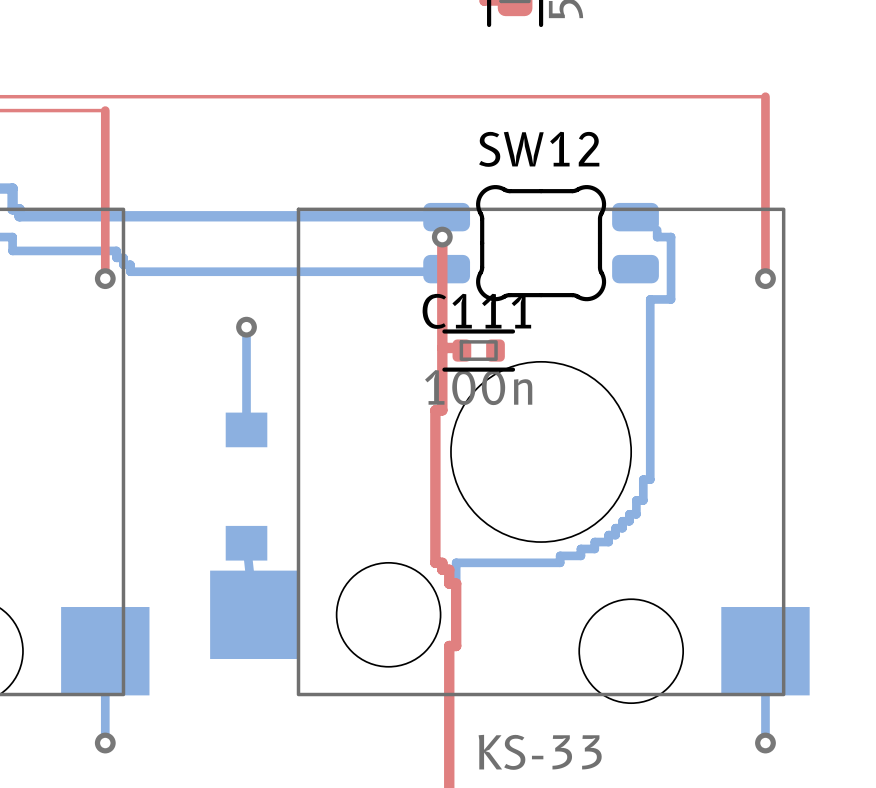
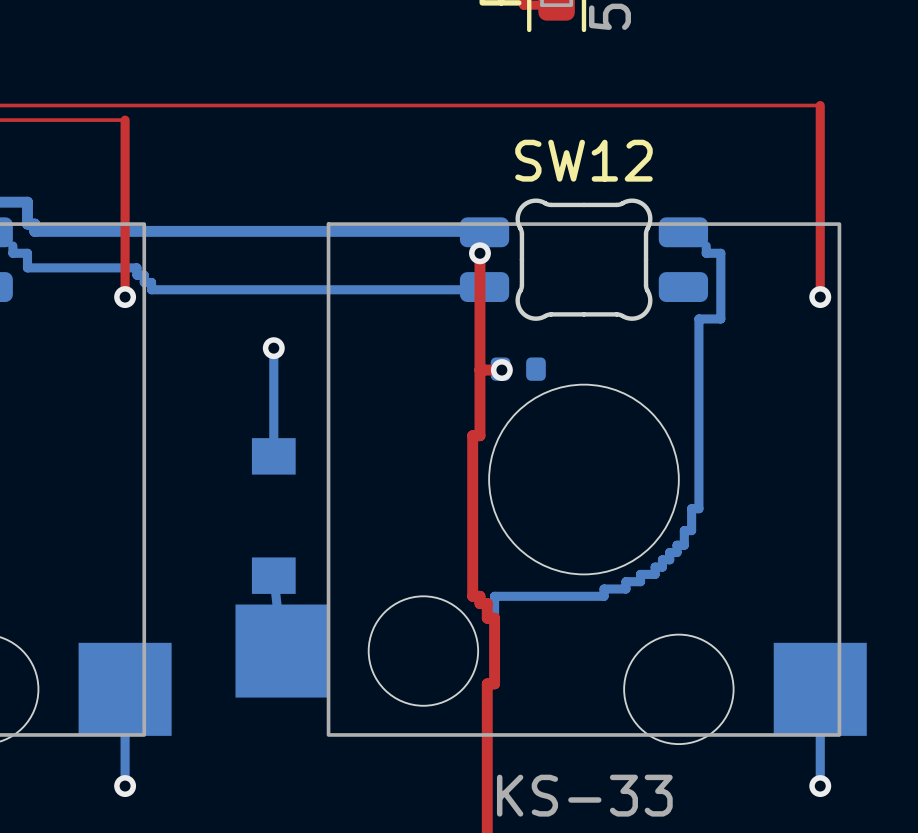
via: none -> (501, 370)
C111 side: top (478, 350) -> bottom (518, 369)

